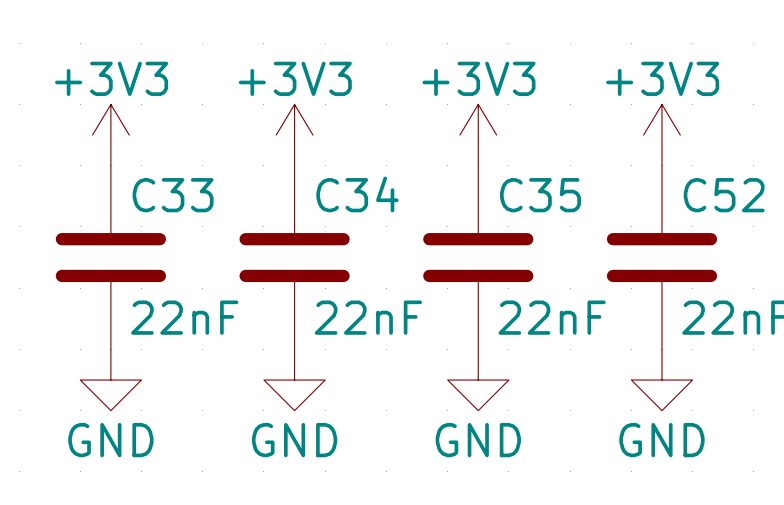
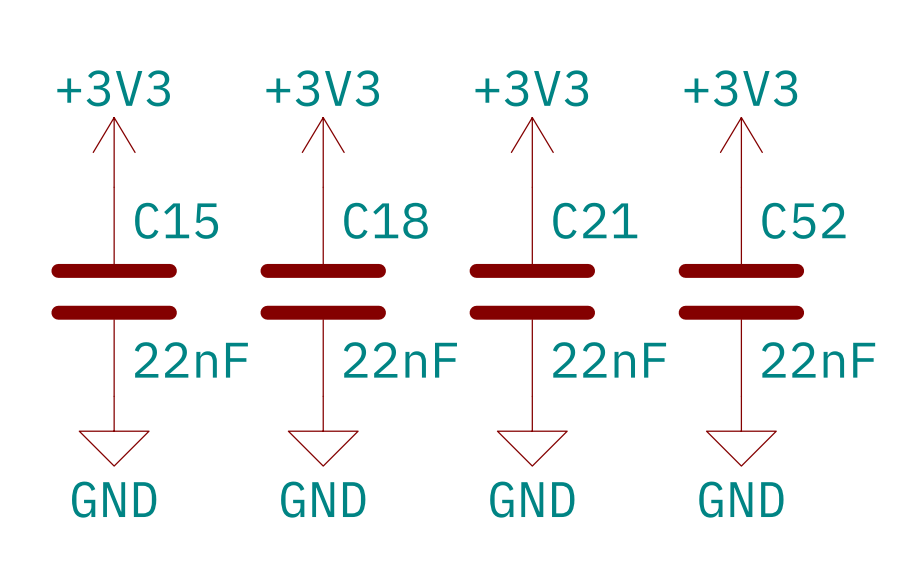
C34 name: C34 (357, 194) -> C18 (385, 220)
C33 name: C33 (173, 195) -> C15 (176, 220)
C35 name: C35 (540, 195) -> C21 (595, 220)

